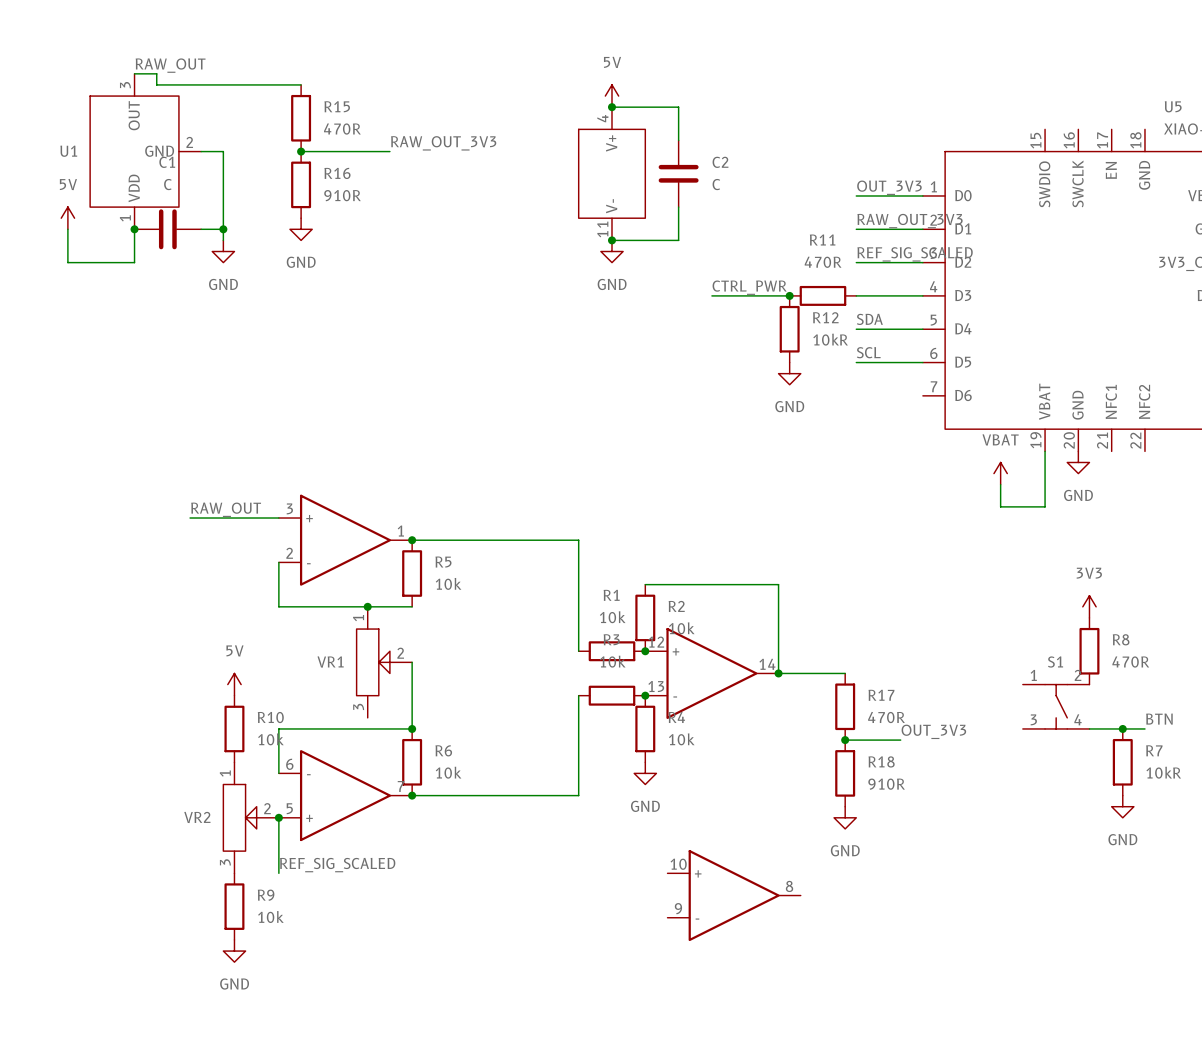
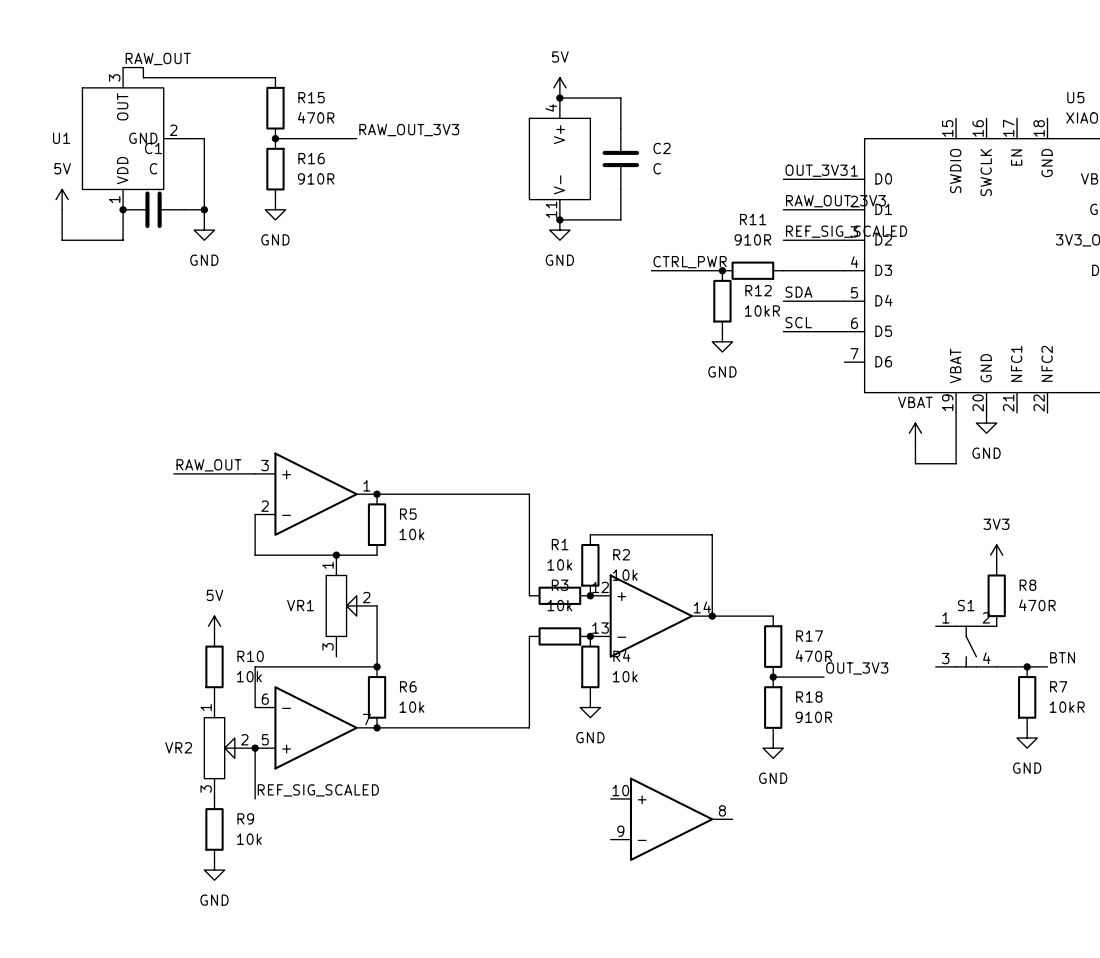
R11 value: 470R (823, 262) -> 910R (752, 239)

